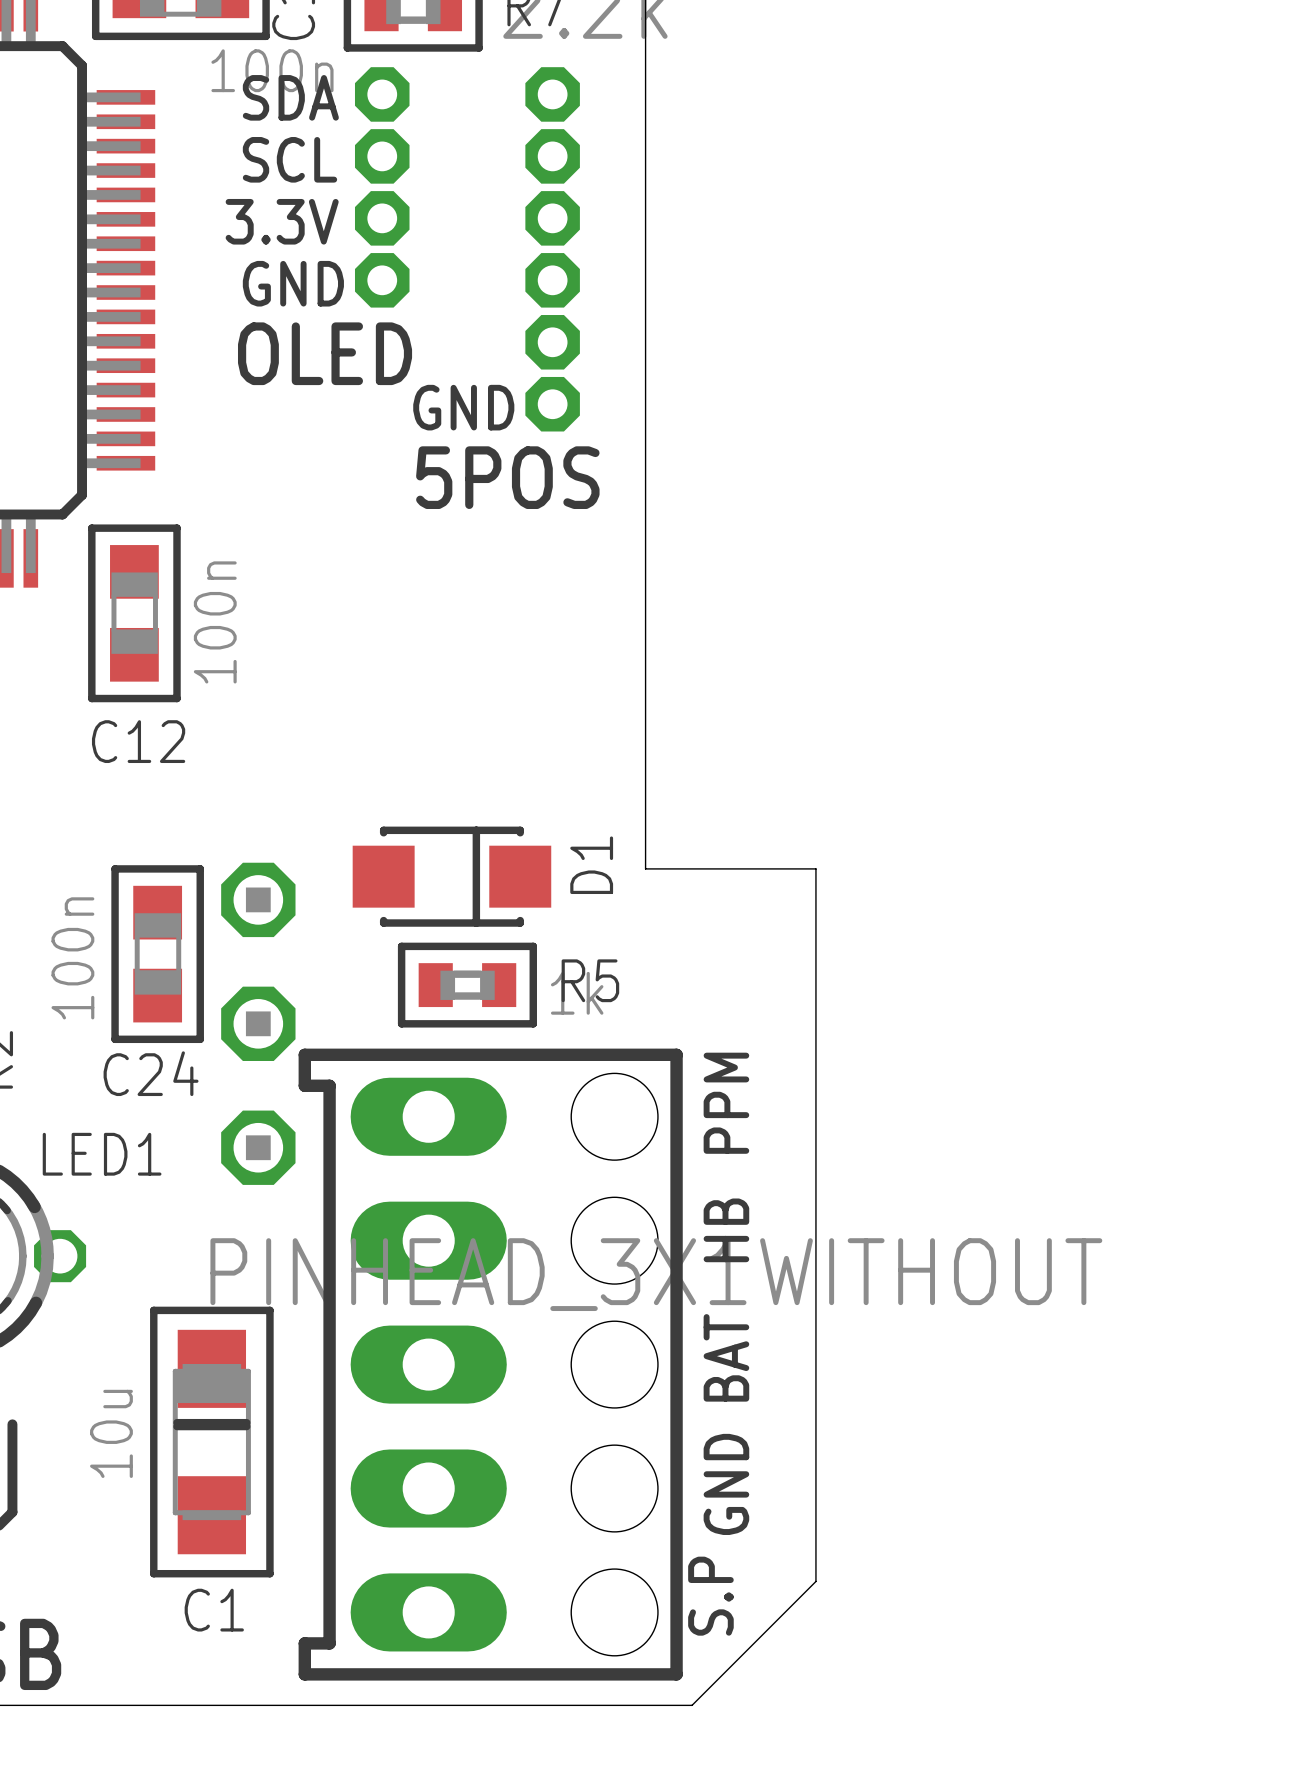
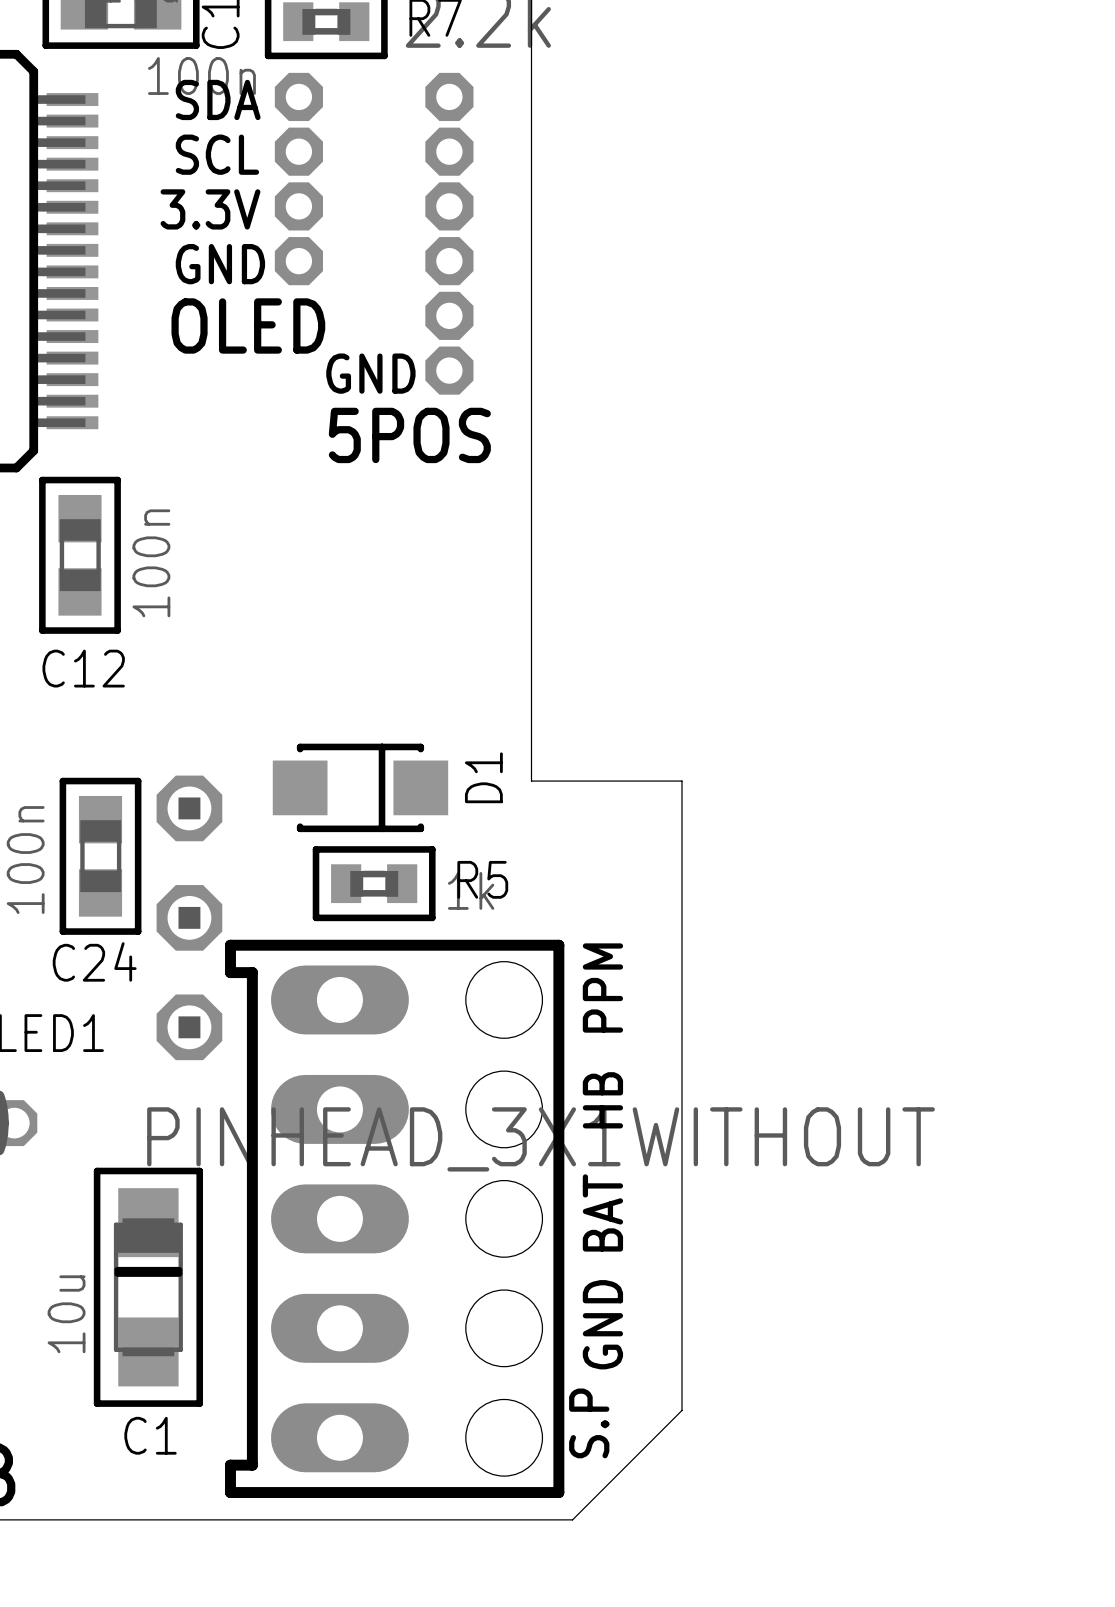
C1 value position: 10u (111, 1433) -> 10u (66, 1314)

